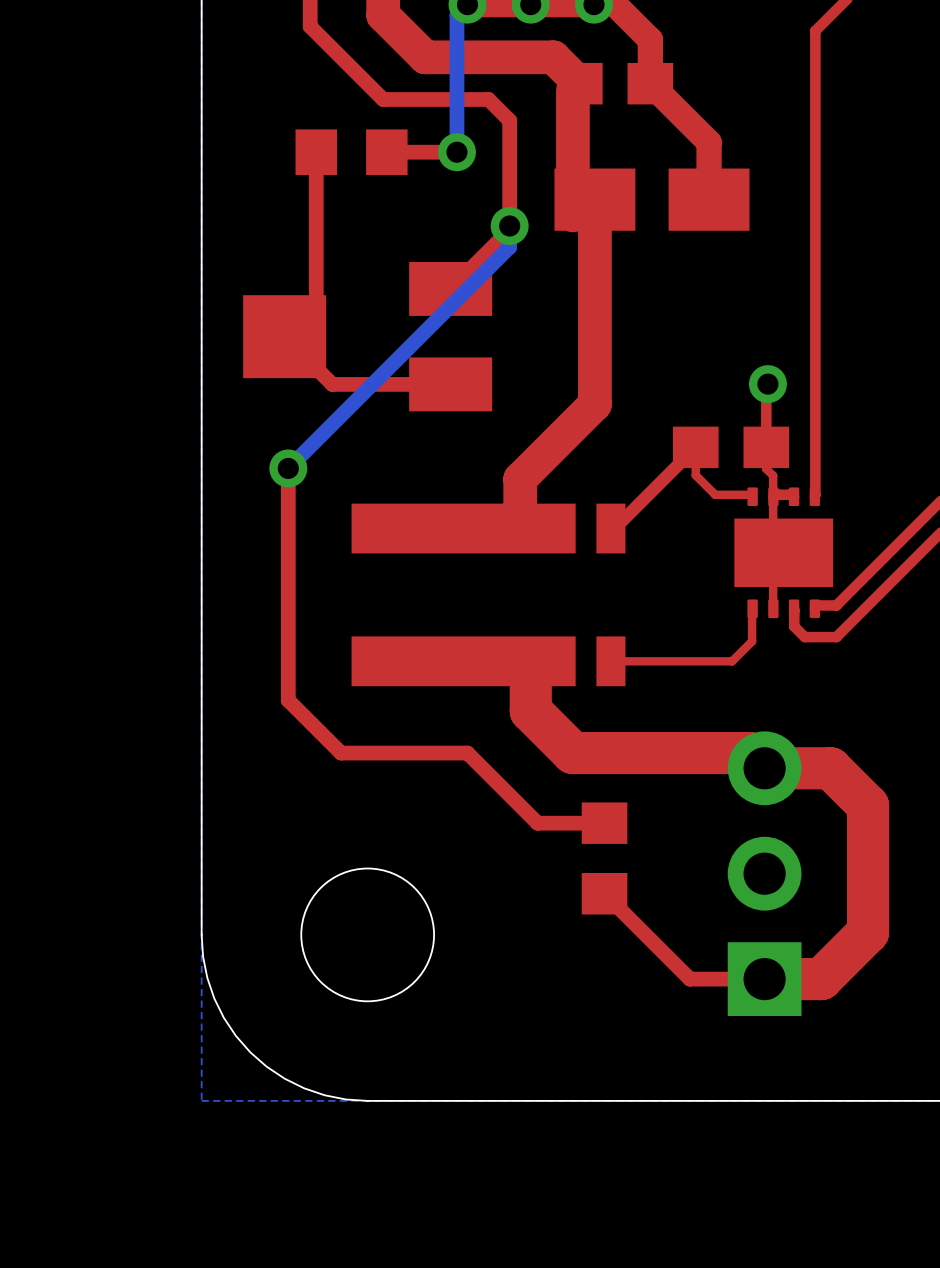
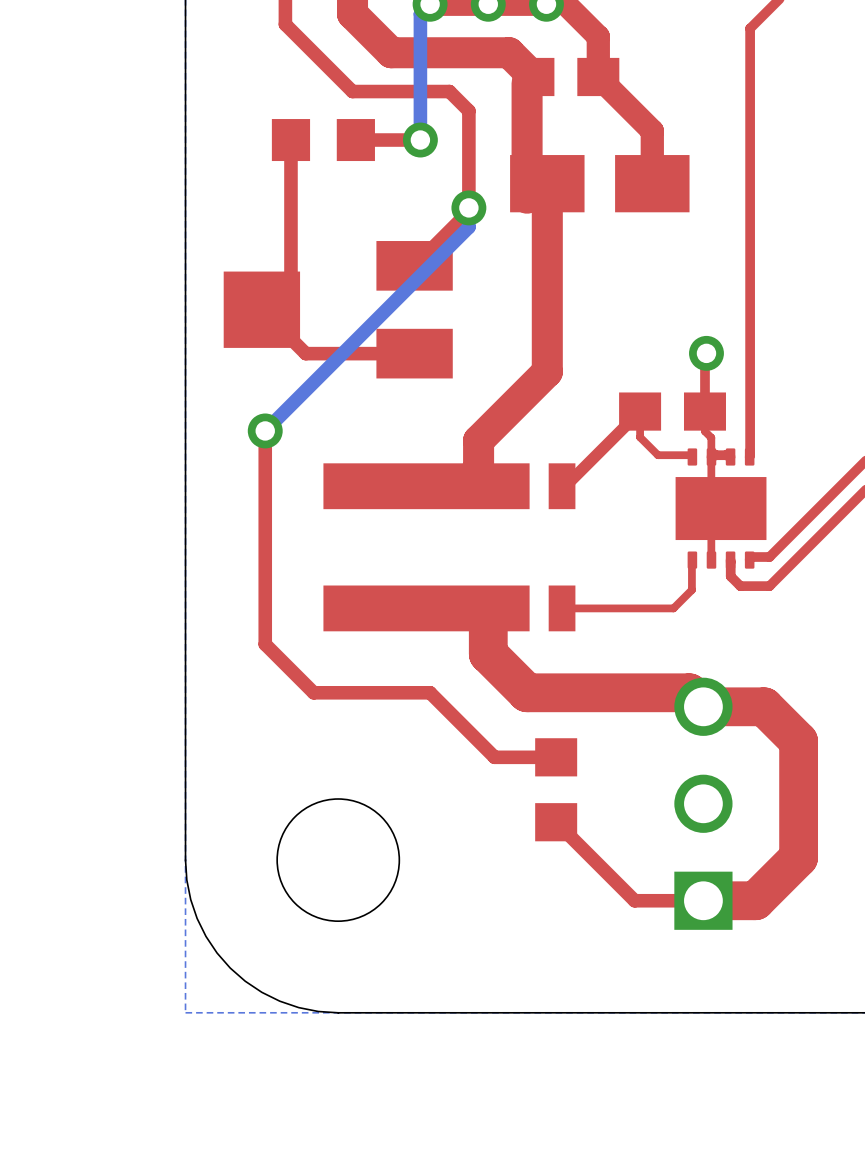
part footprint: [727, 731, 802, 1017] -> [674, 677, 733, 930]

